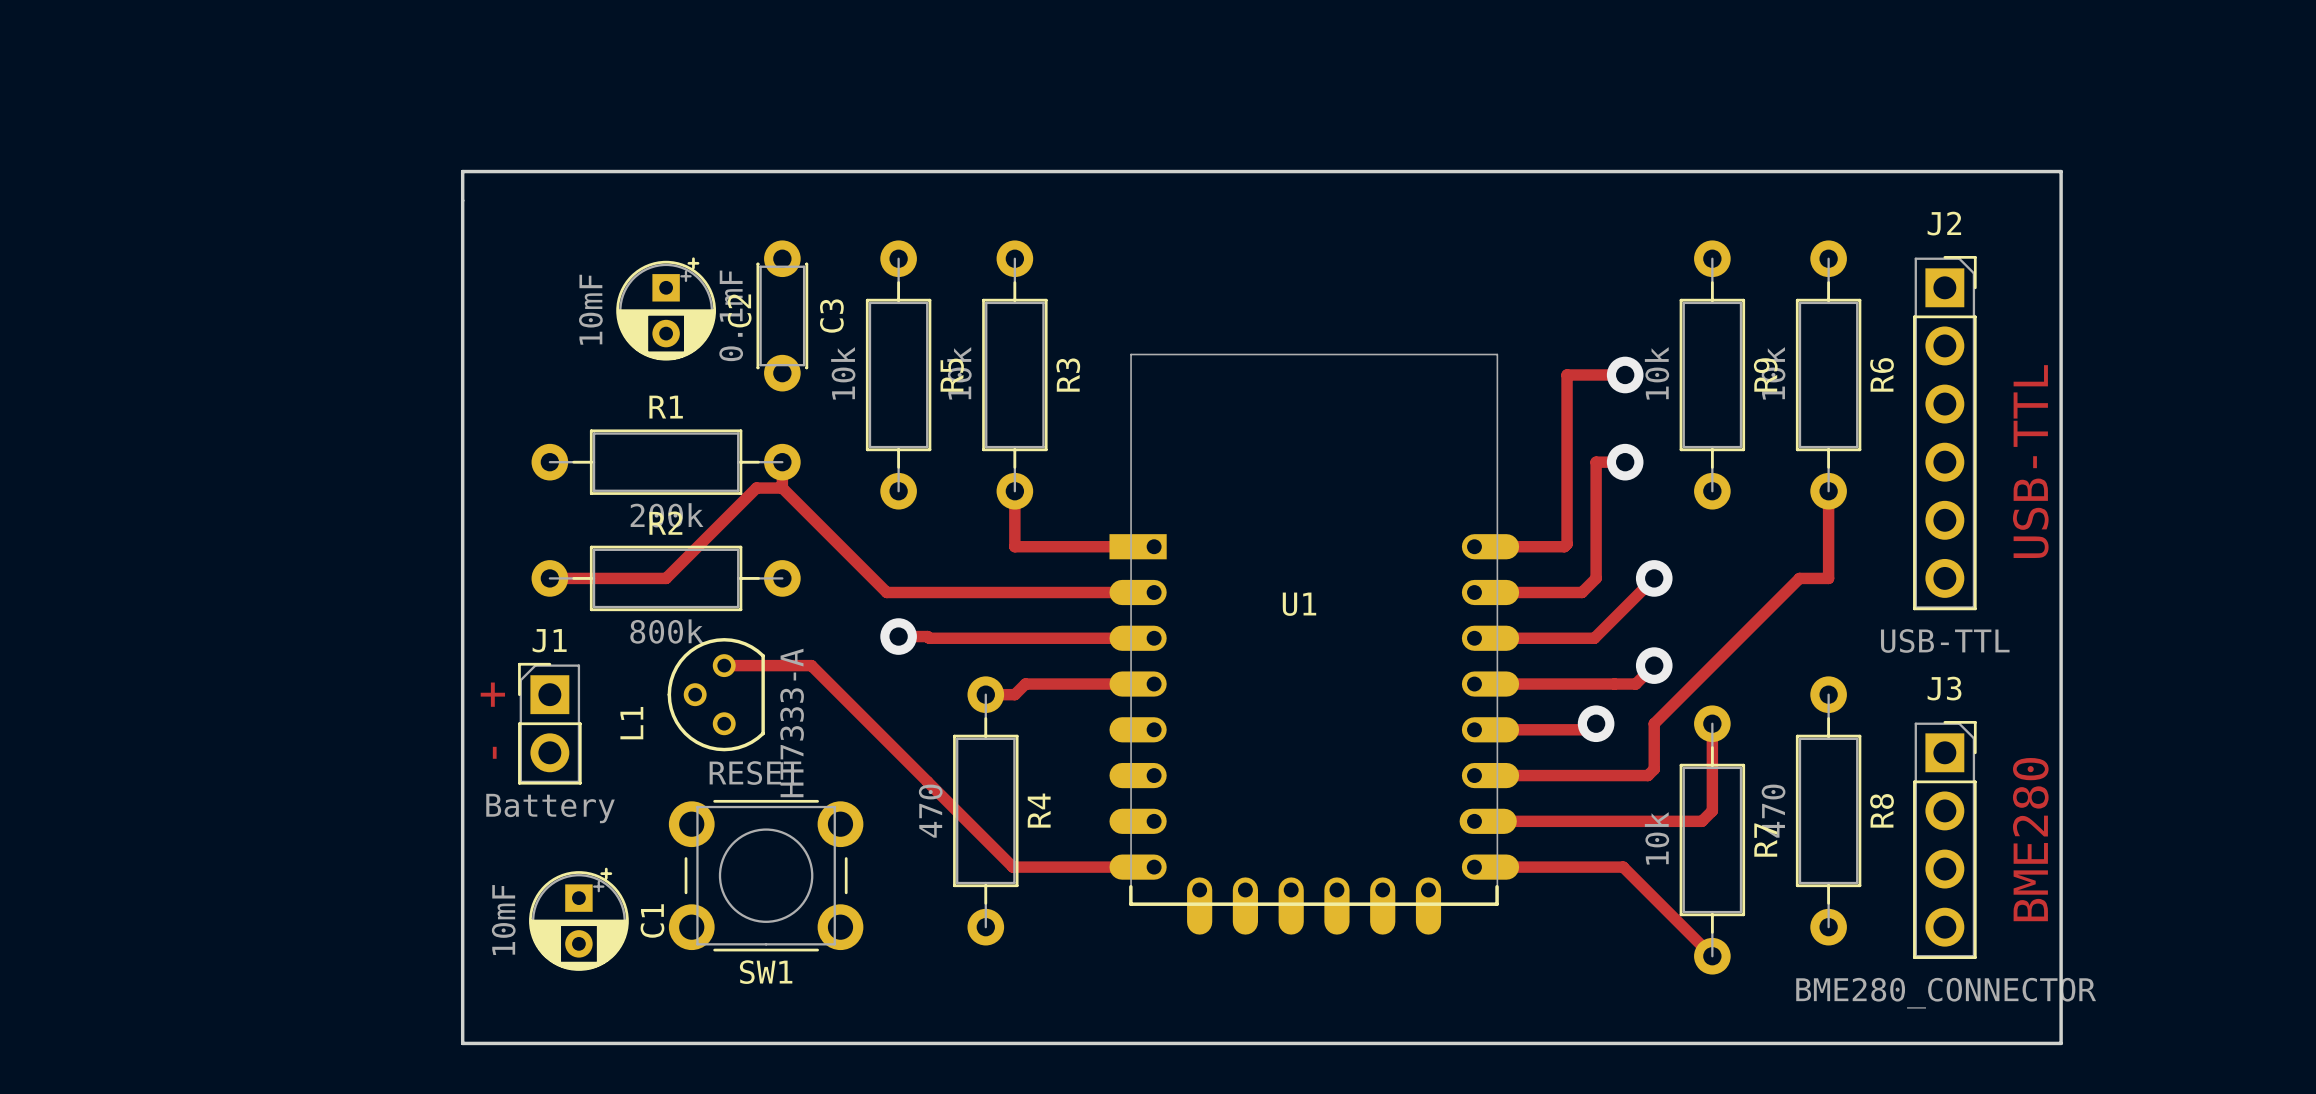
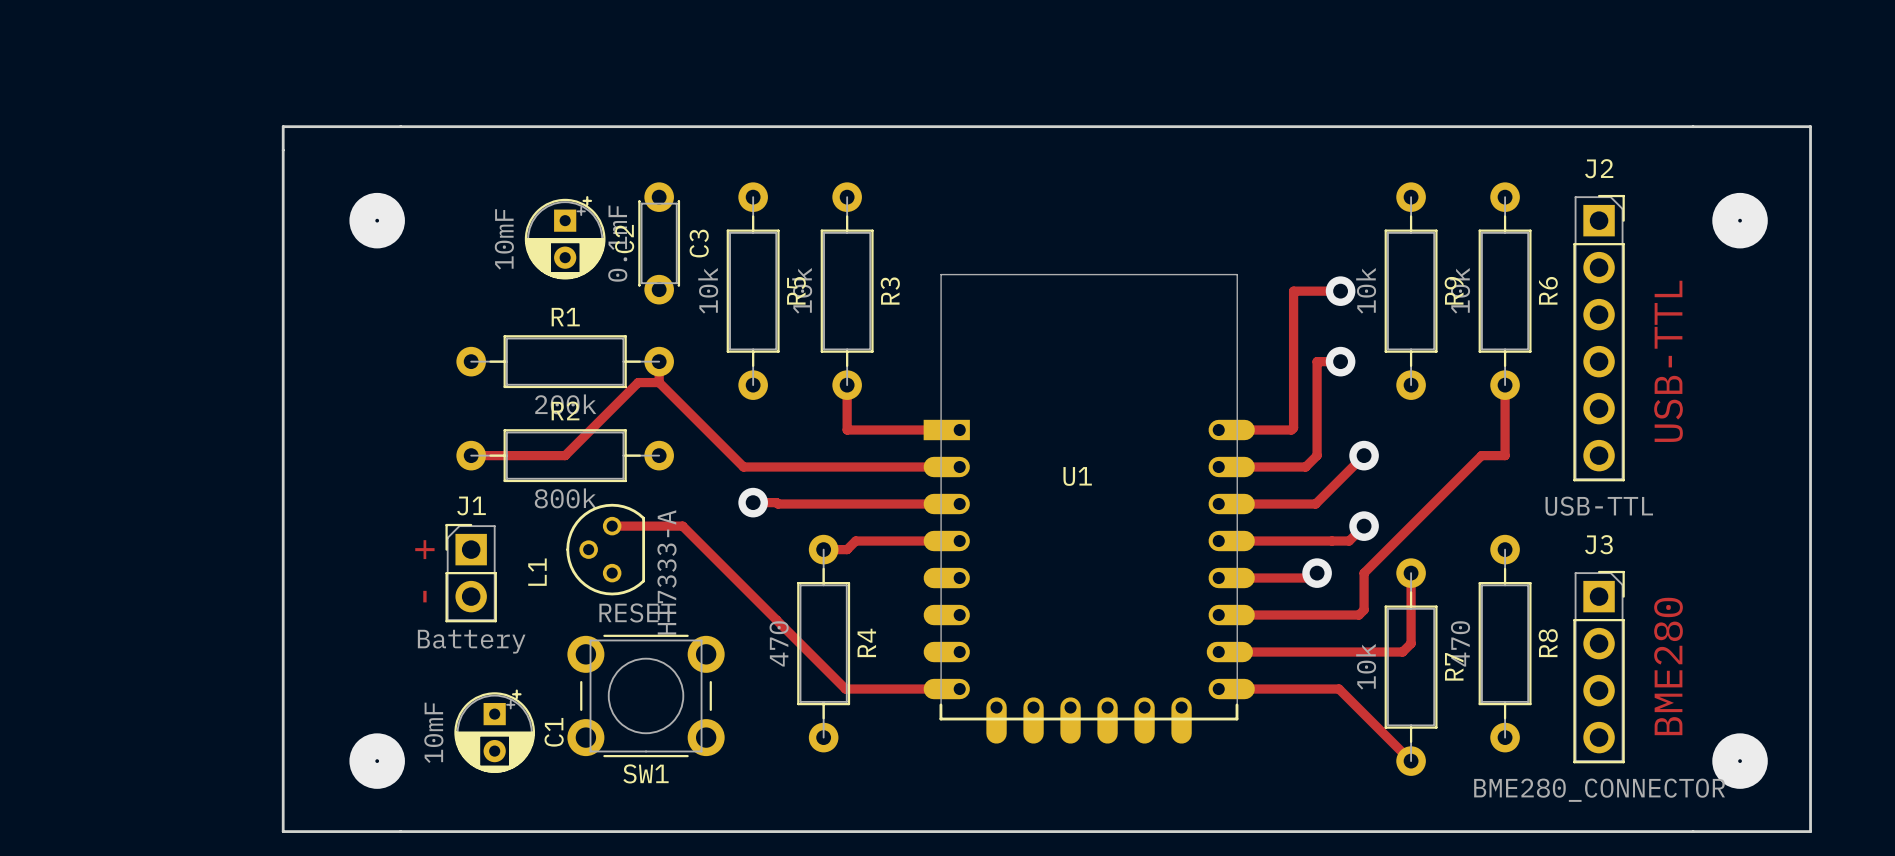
board edge: (462, 171) (462, 1043) -> (400, 126) (283, 126) (283, 831) (400, 831)
board edge: (2061, 171) (2061, 1043) -> (1693, 126) (1810, 126) (1810, 831) (1693, 831)
via: none -> (377, 220)
via: none -> (1740, 220)
via: none -> (377, 761)
via: none -> (1740, 761)

